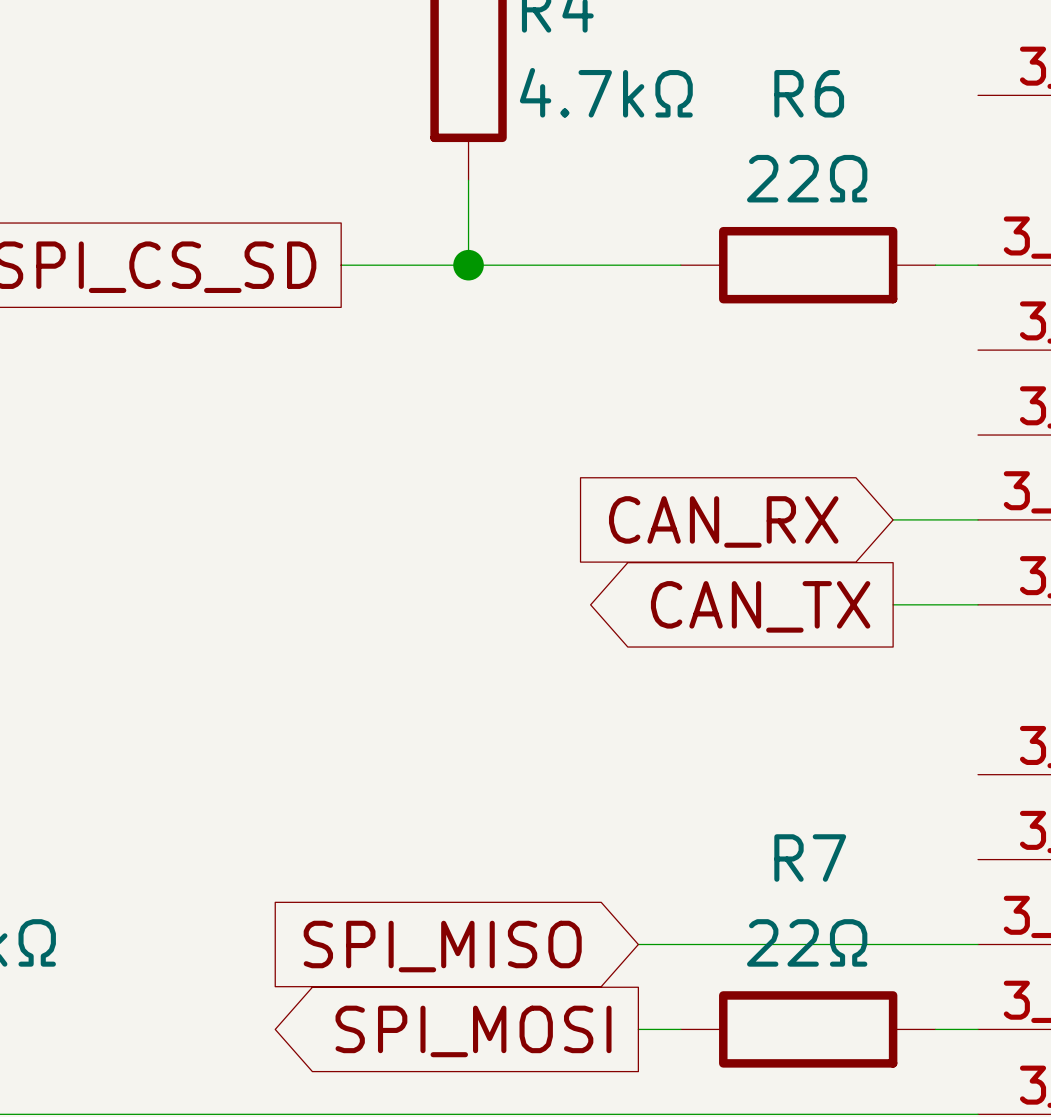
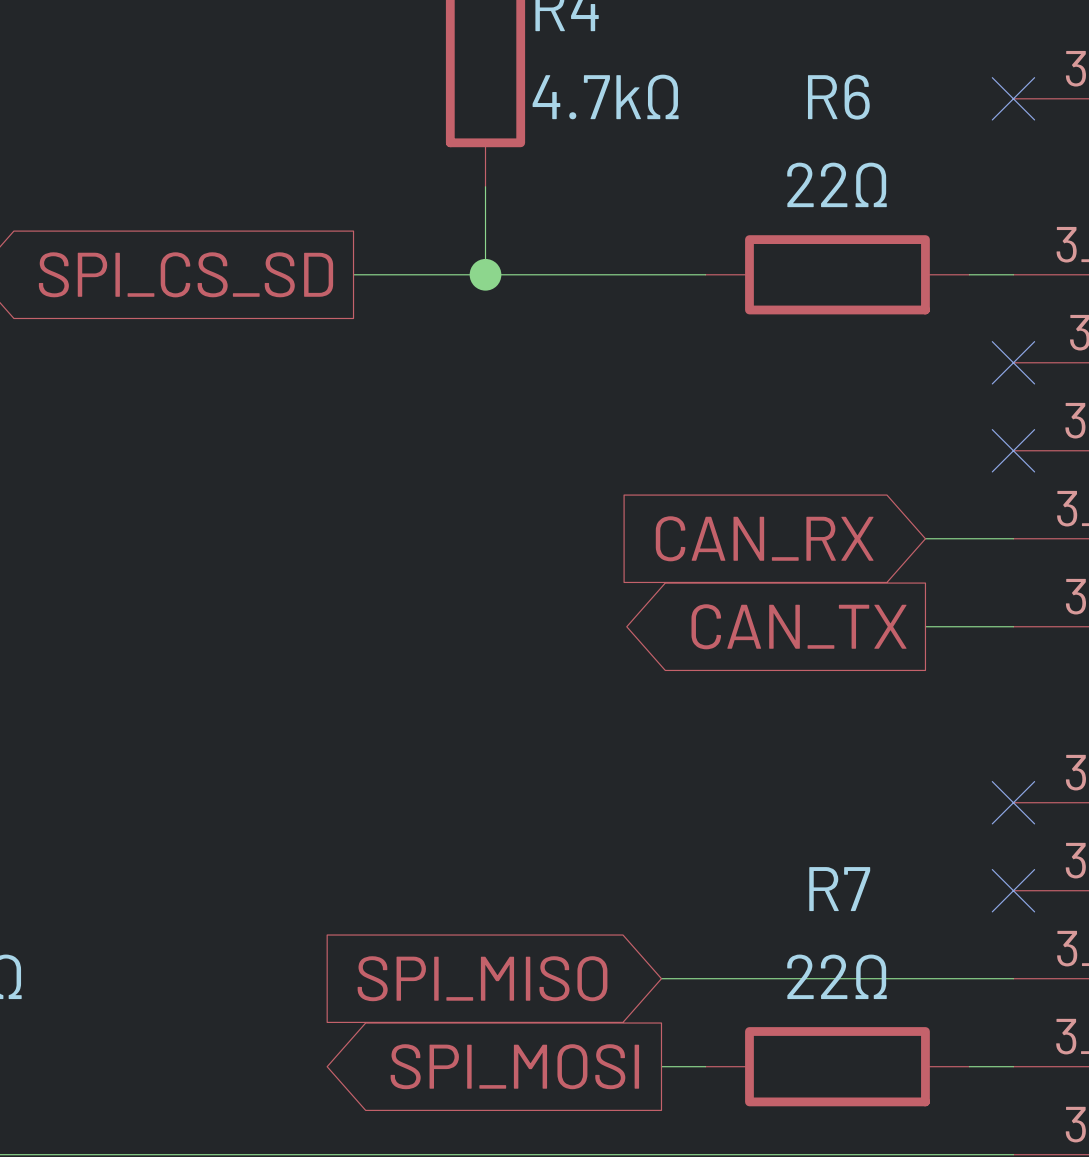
no-connect mark: none -> (1013, 98)
no-connect mark: none -> (1013, 362)
no-connect mark: none -> (1013, 450)
no-connect mark: none -> (1013, 802)
no-connect mark: none -> (1013, 890)

